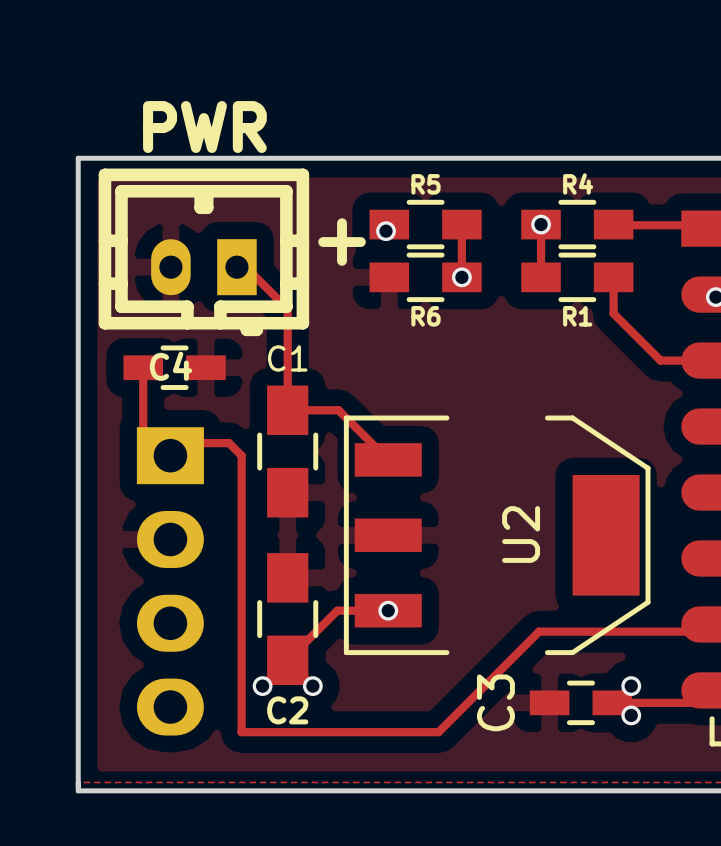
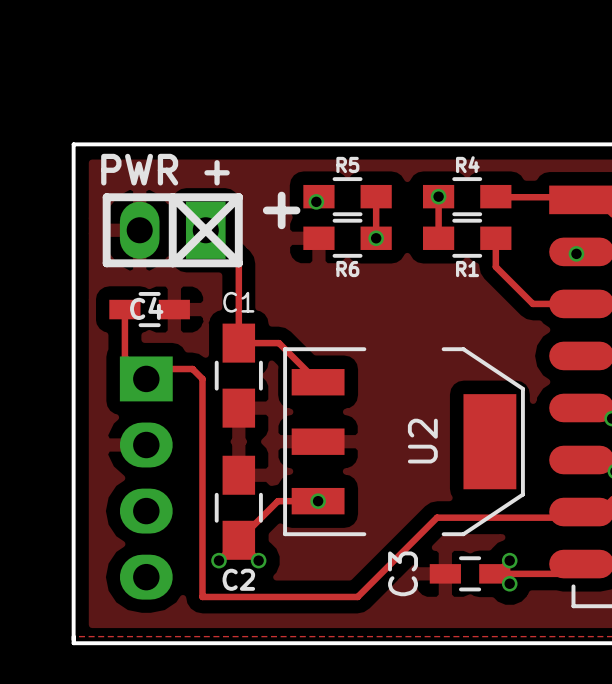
part: PWR (203, 252) -> none
PWR +: none -> (172, 230)

